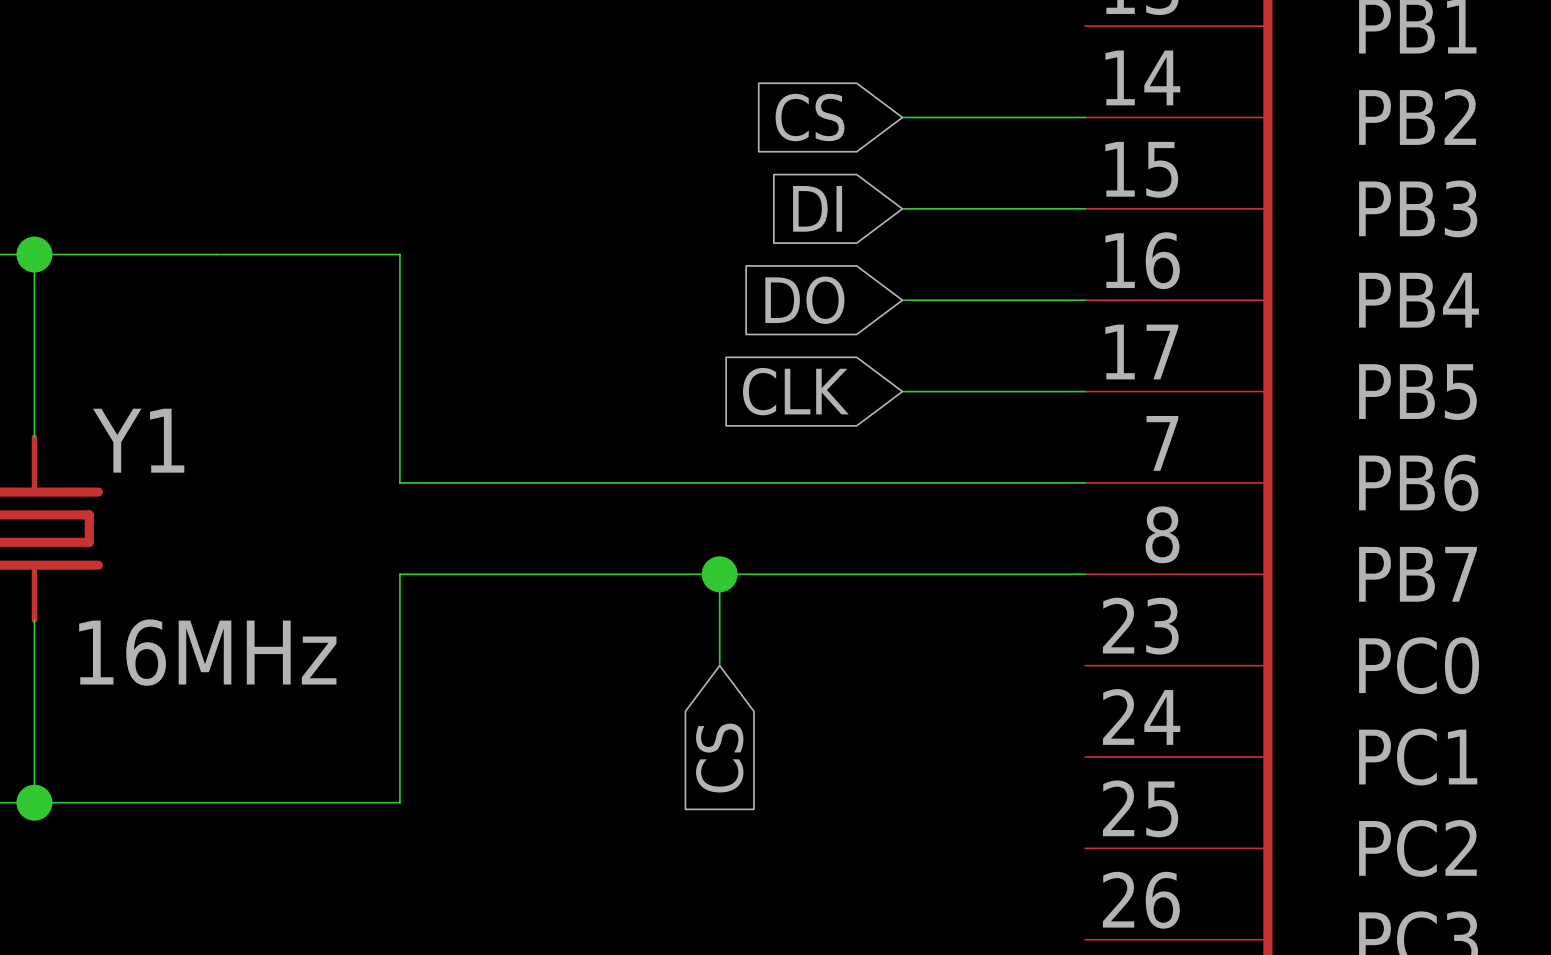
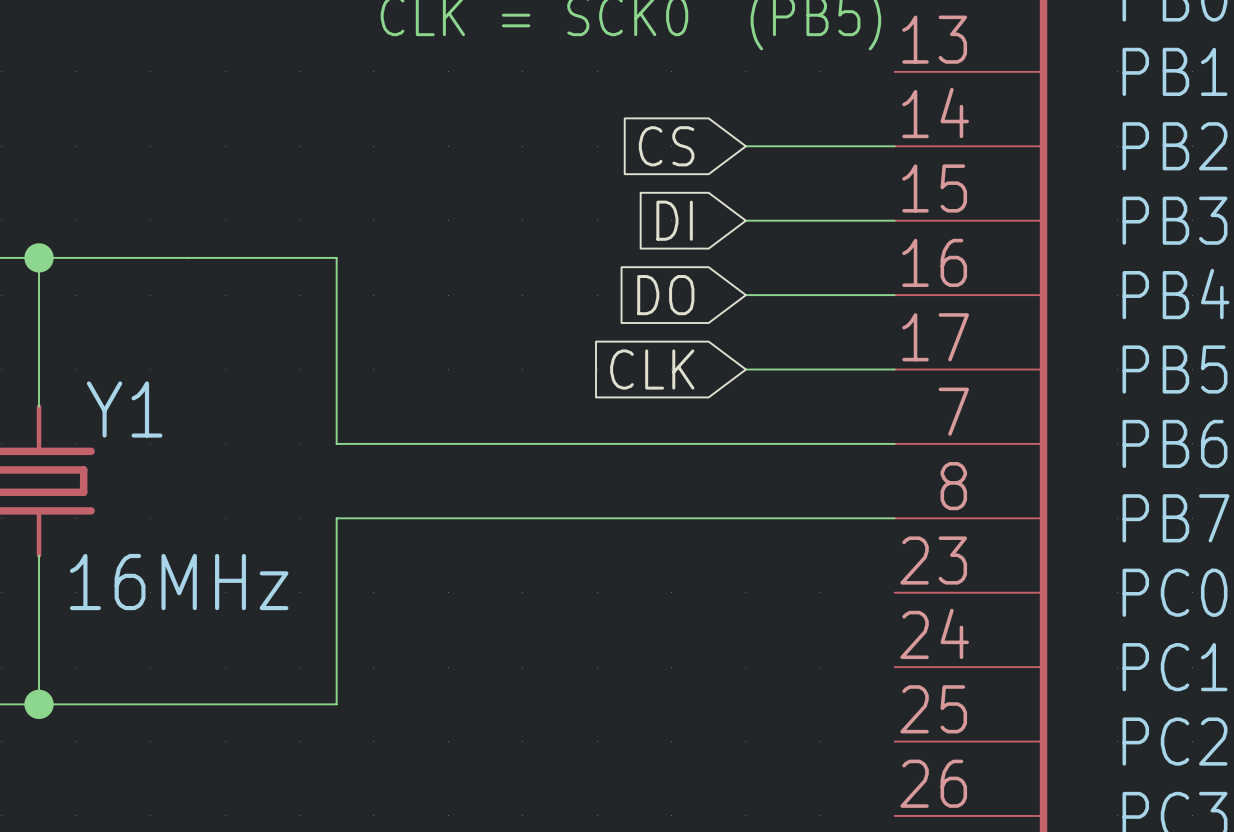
wire: (719, 574) (719, 665) -> none
junction: (719, 574) -> none
global label: CS (719, 758) -> none

